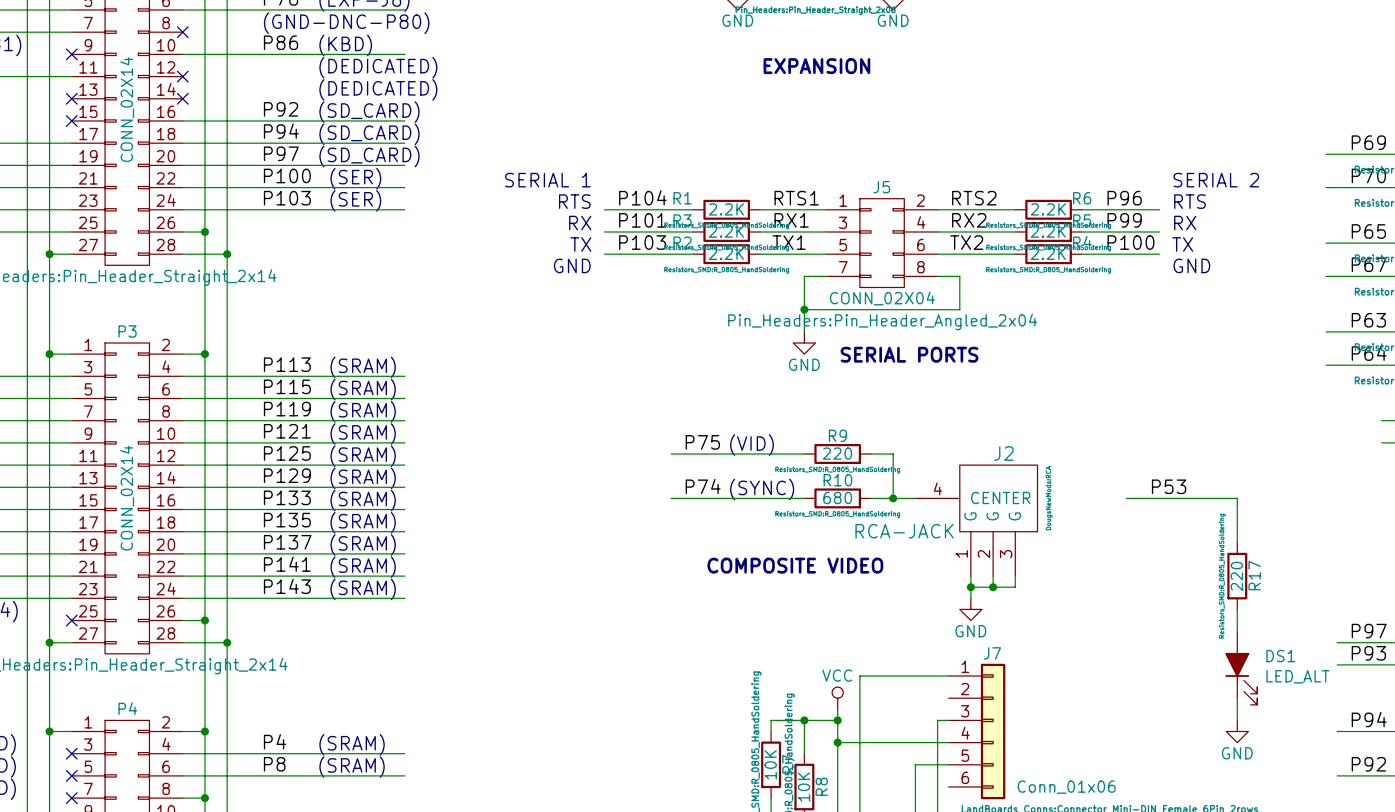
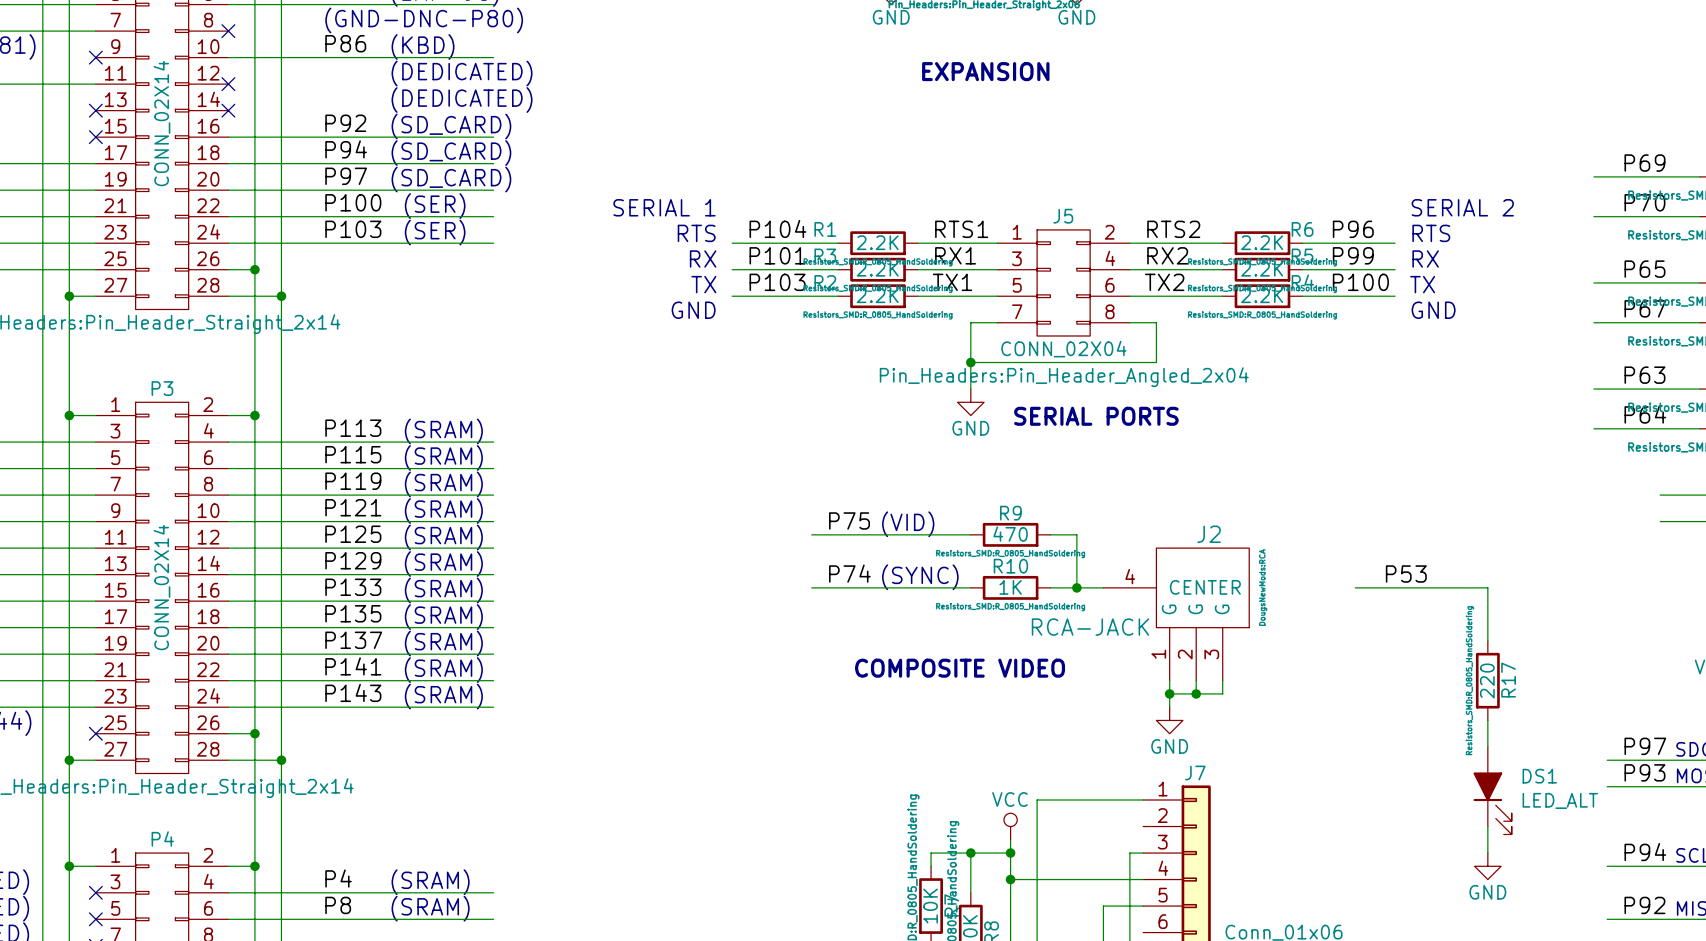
R9 value: 220 (837, 453) -> 470 (1010, 534)
R10 value: 680 (837, 497) -> 1K (1010, 587)

